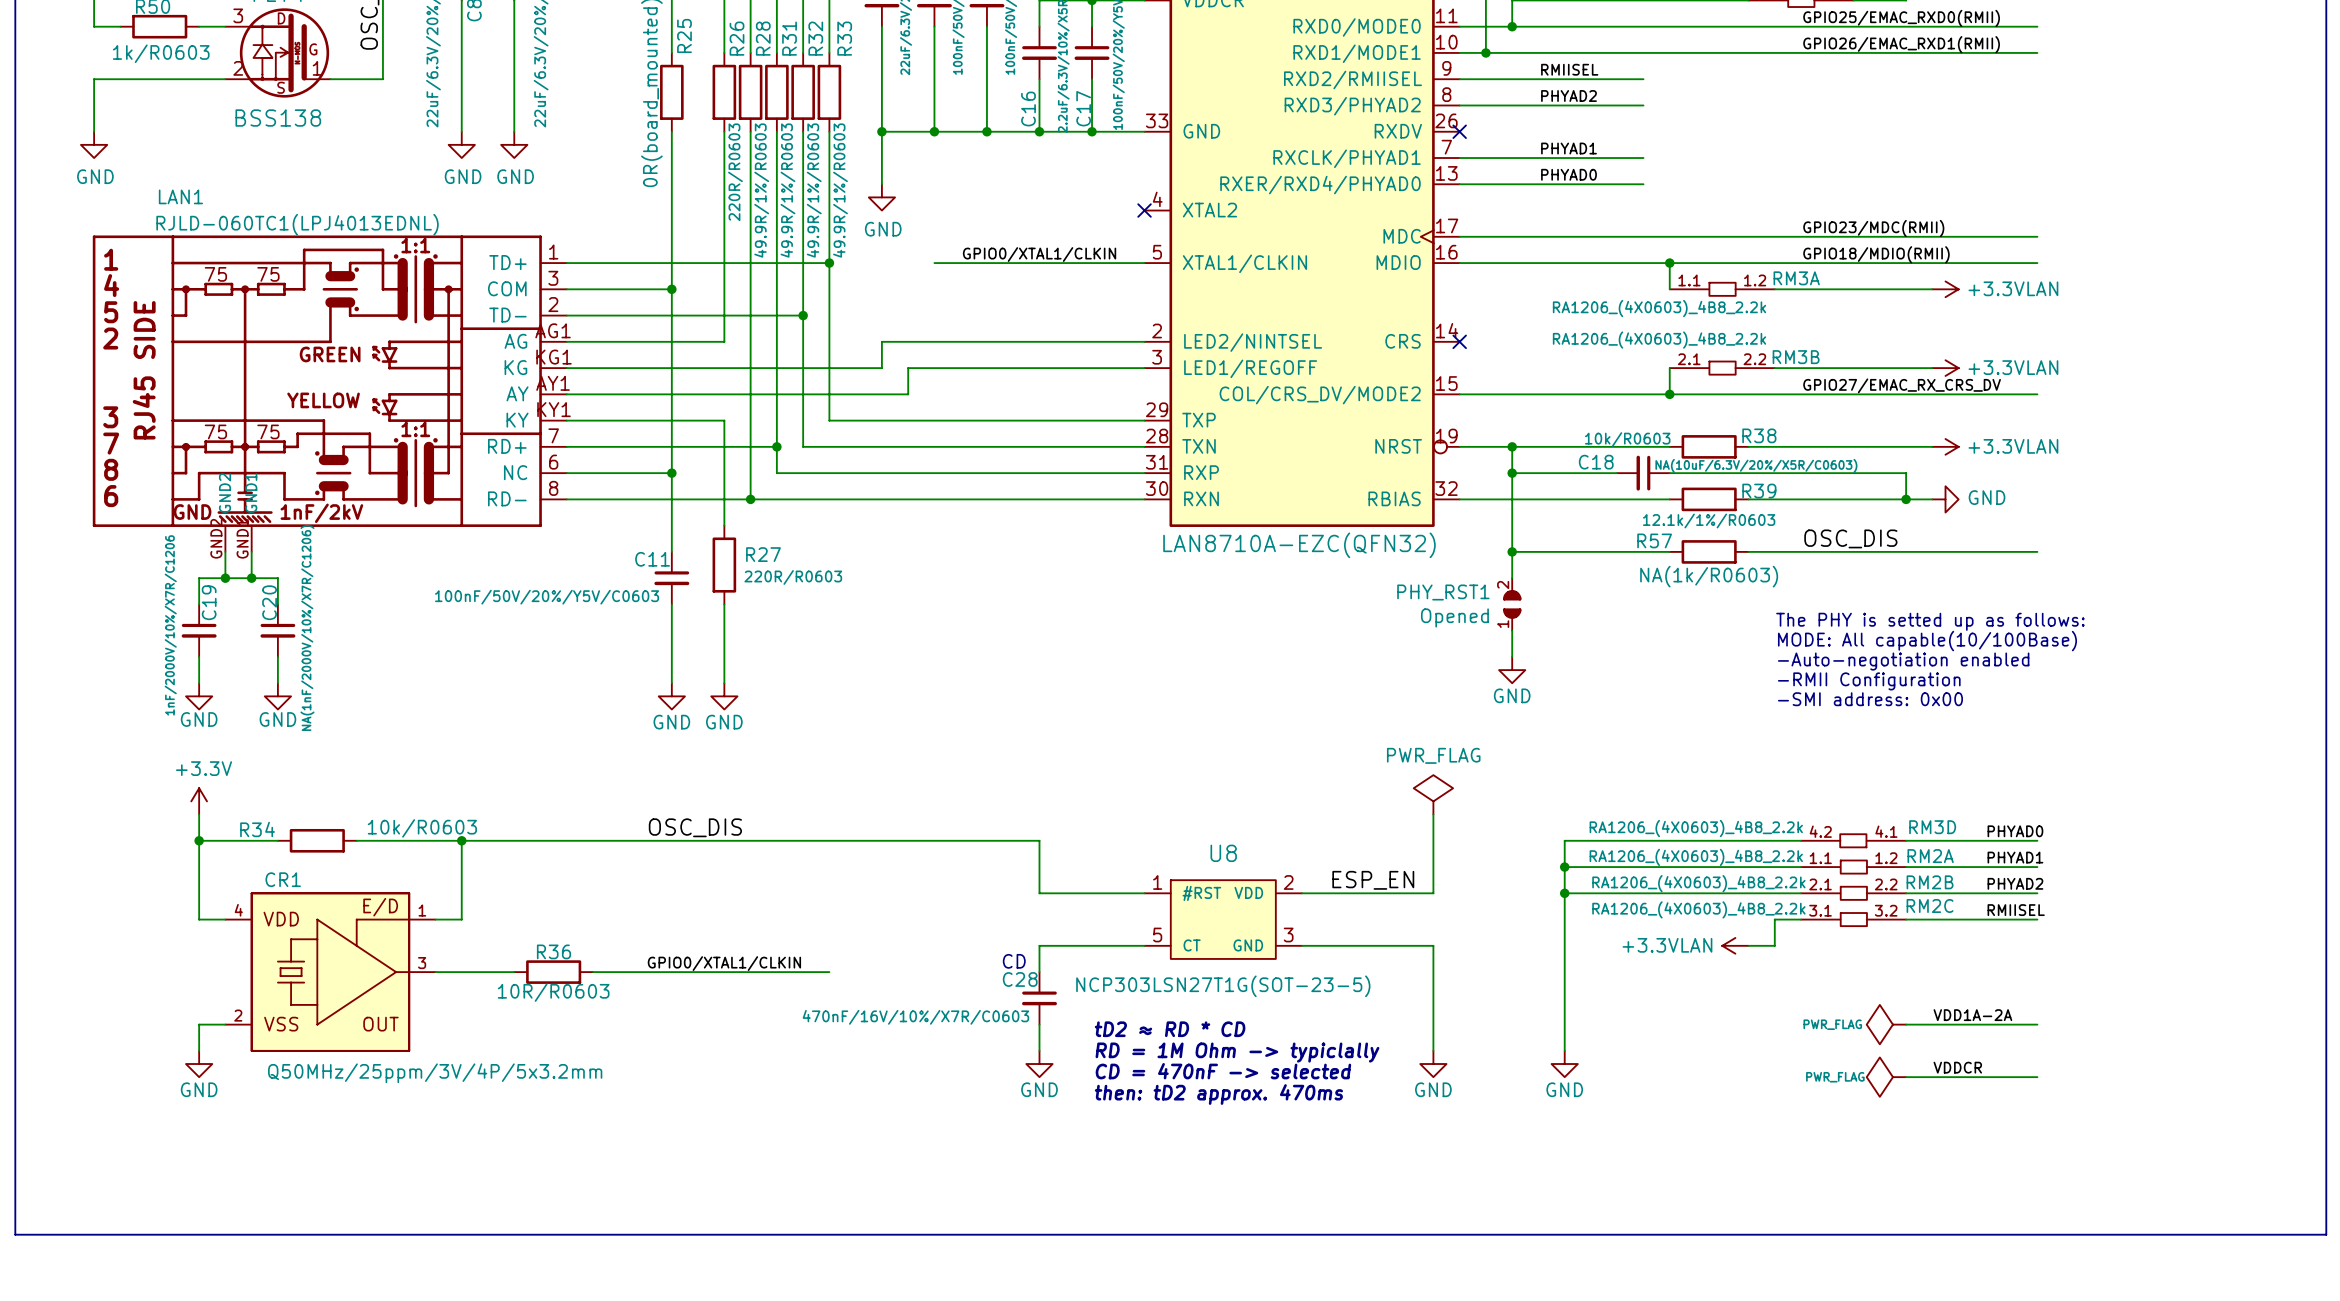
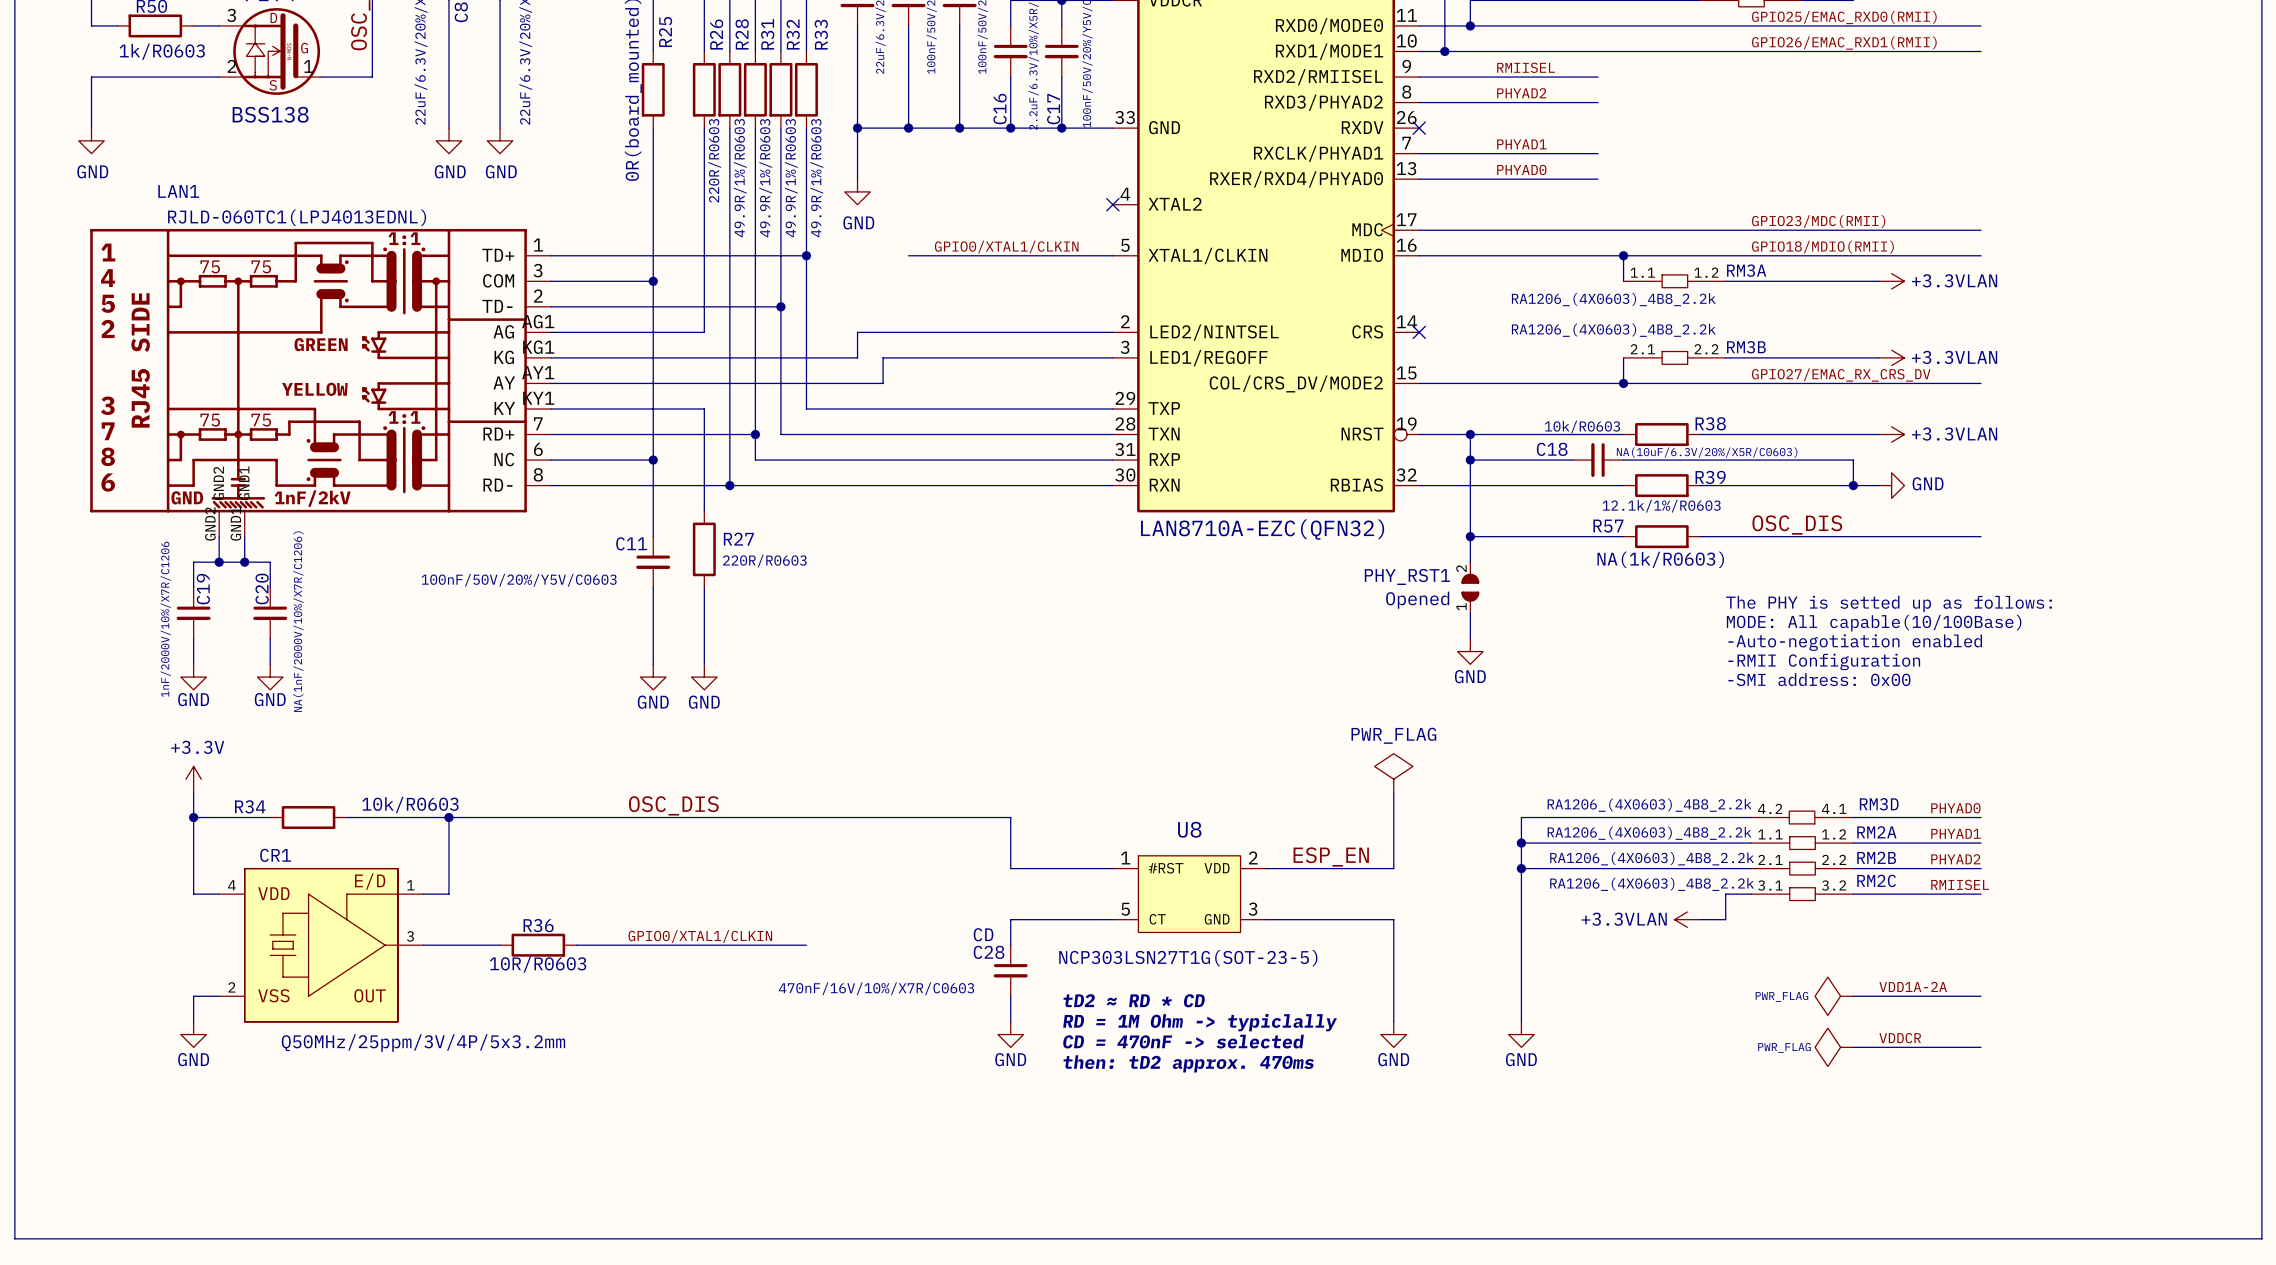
line: (15, 1234) (2326, 1234) -> (14, 1200) (14, 1238) (2261, 1238) (2261, 1200)

